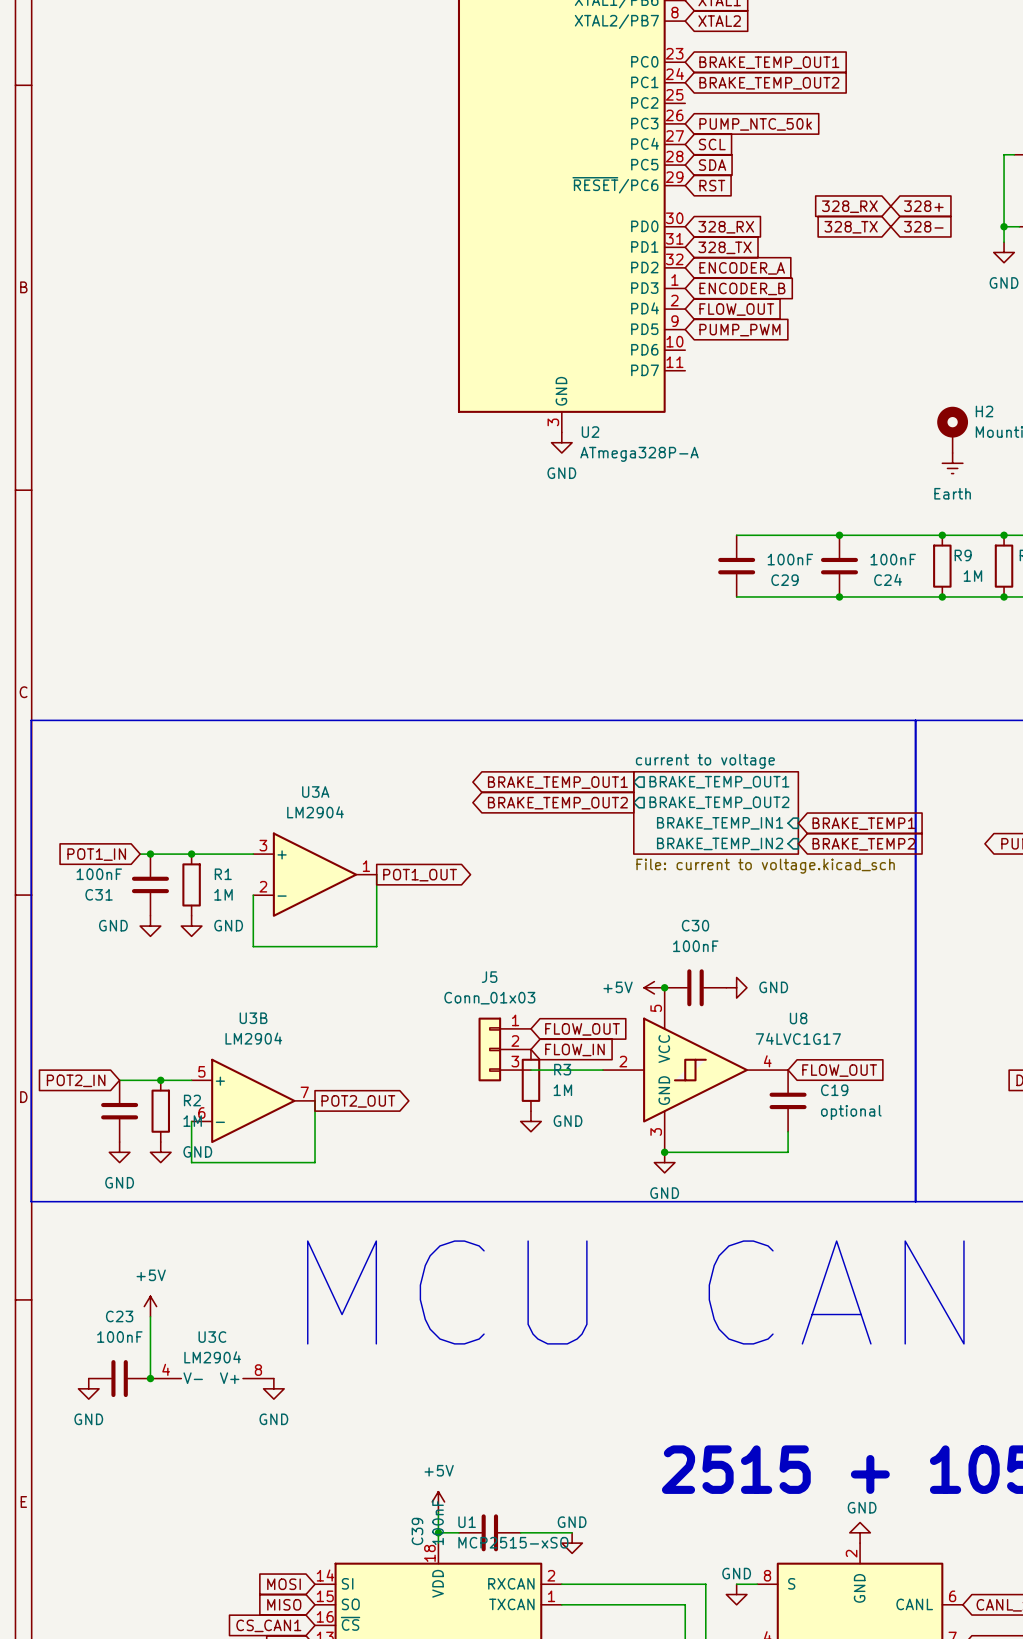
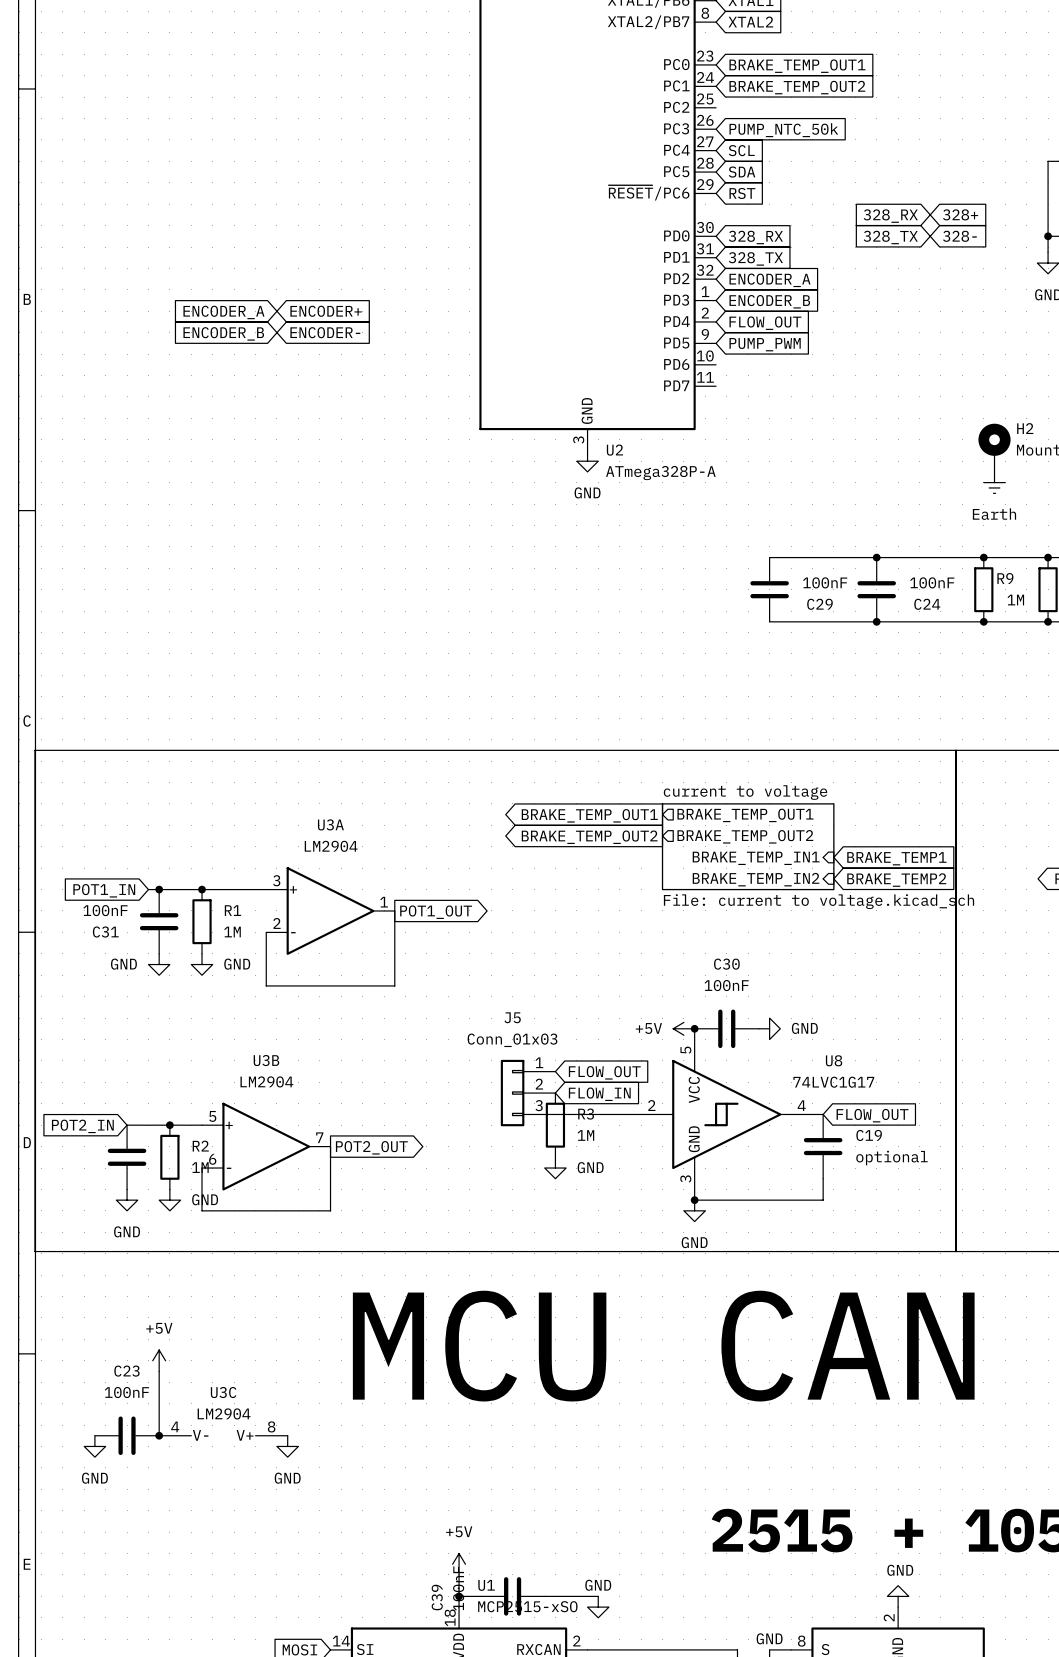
global label: none -> ENCODER+ (326, 311)
global label: none -> ENCODER_A (223, 312)
global label: none -> ENCODER_B (223, 333)
global label: none -> ENCODER- (325, 332)

